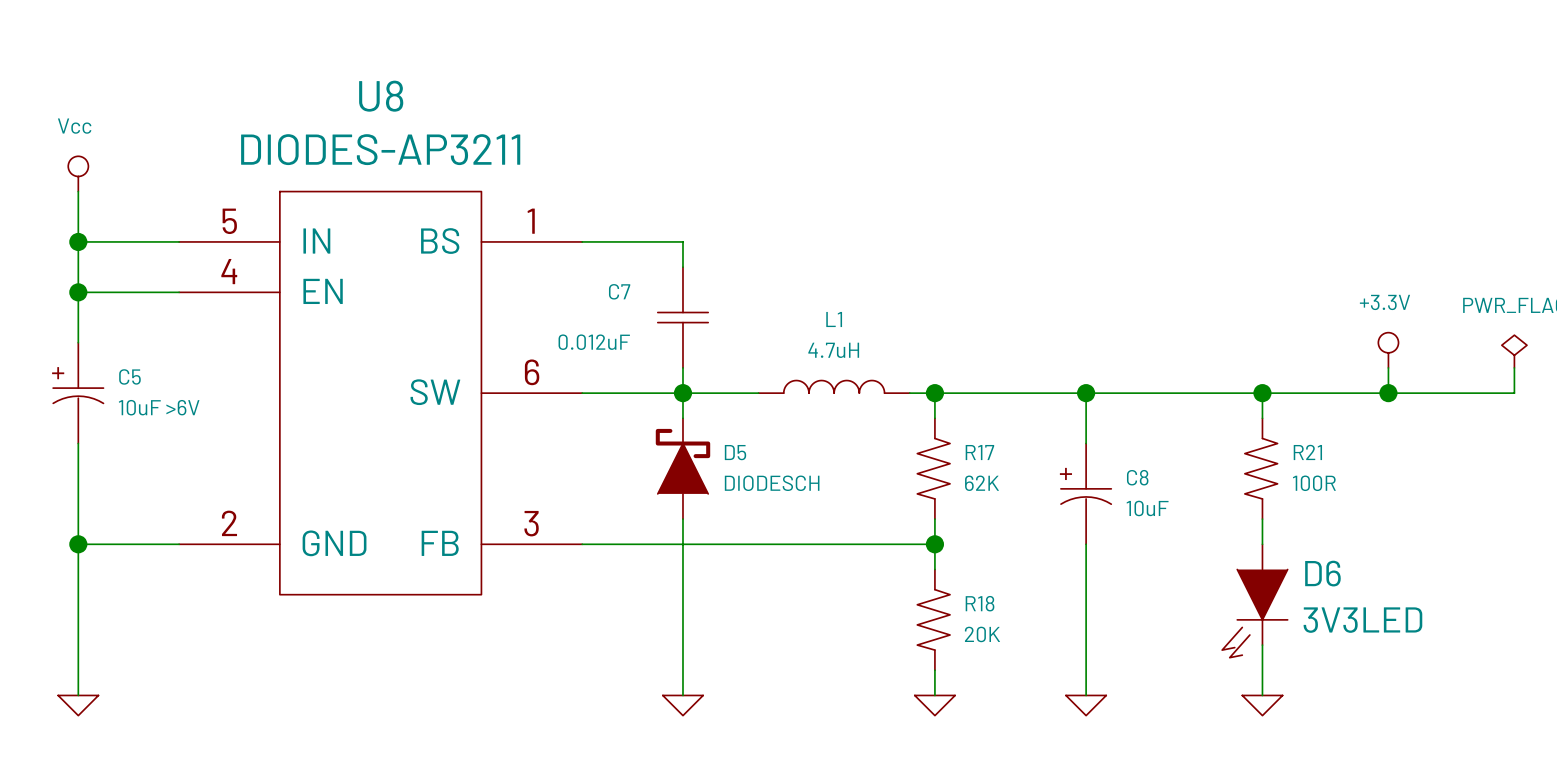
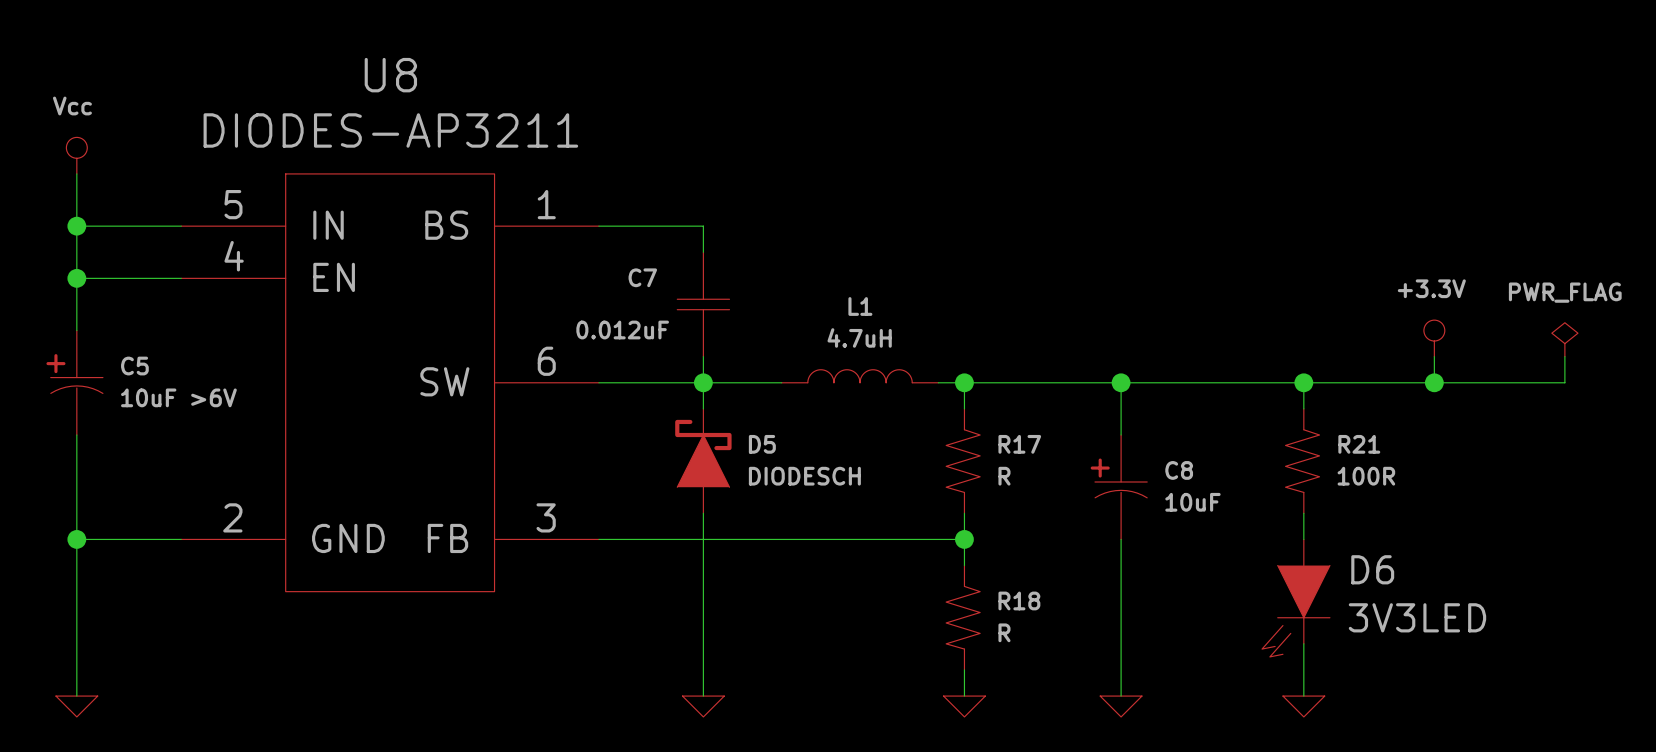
R17 value: 62K (982, 483) -> R (1004, 476)
R18 value: 20K (982, 634) -> R (1004, 632)

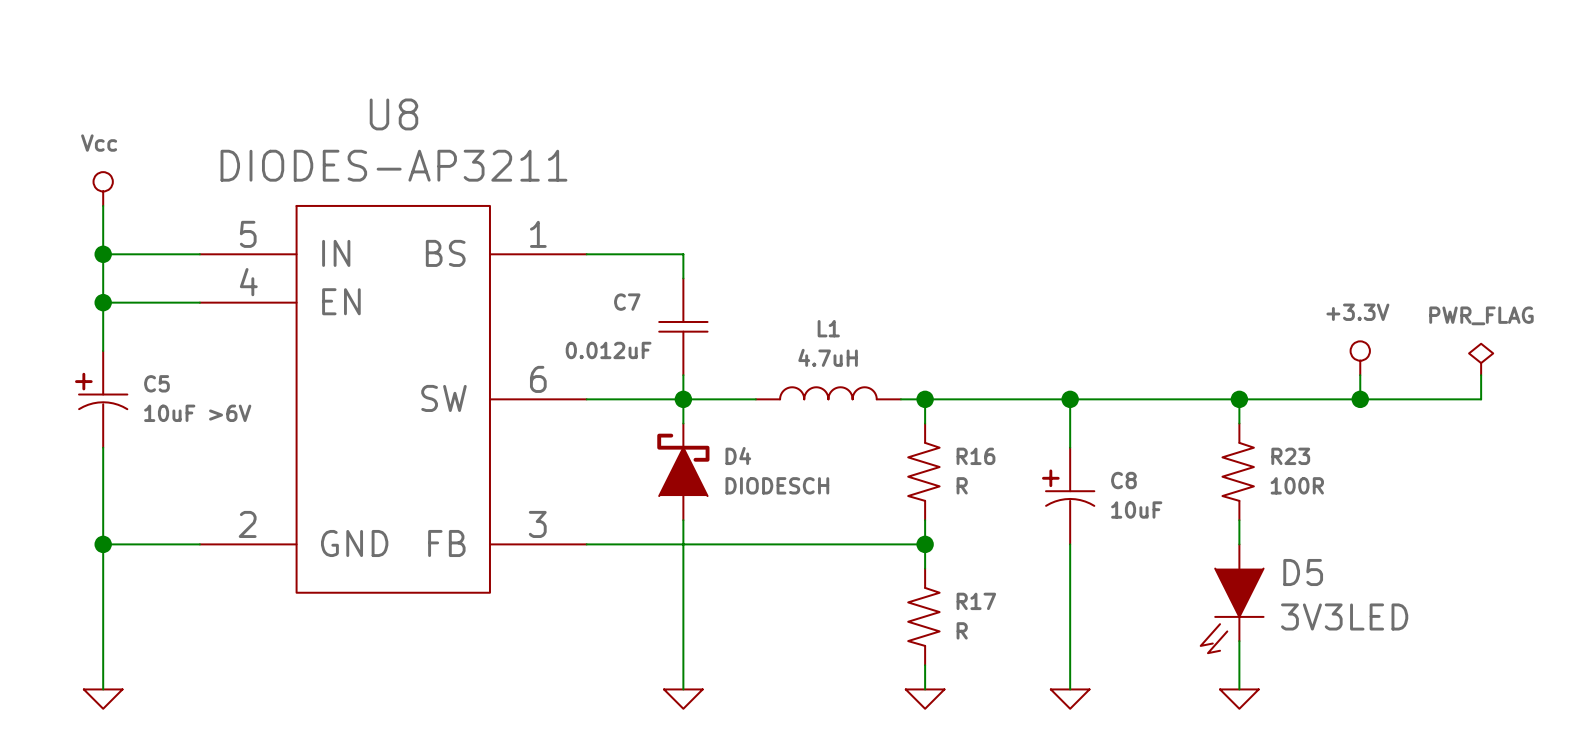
D5 name: D5 (762, 444) -> D4 (738, 455)
R17 name: R17 (1019, 444) -> R16 (975, 456)
R21 name: R21 (1359, 444) -> R23 (1290, 456)
D6 name: D6 (1372, 569) -> D5 (1303, 572)
R18 name: R18 (1019, 600) -> R17 (976, 601)

